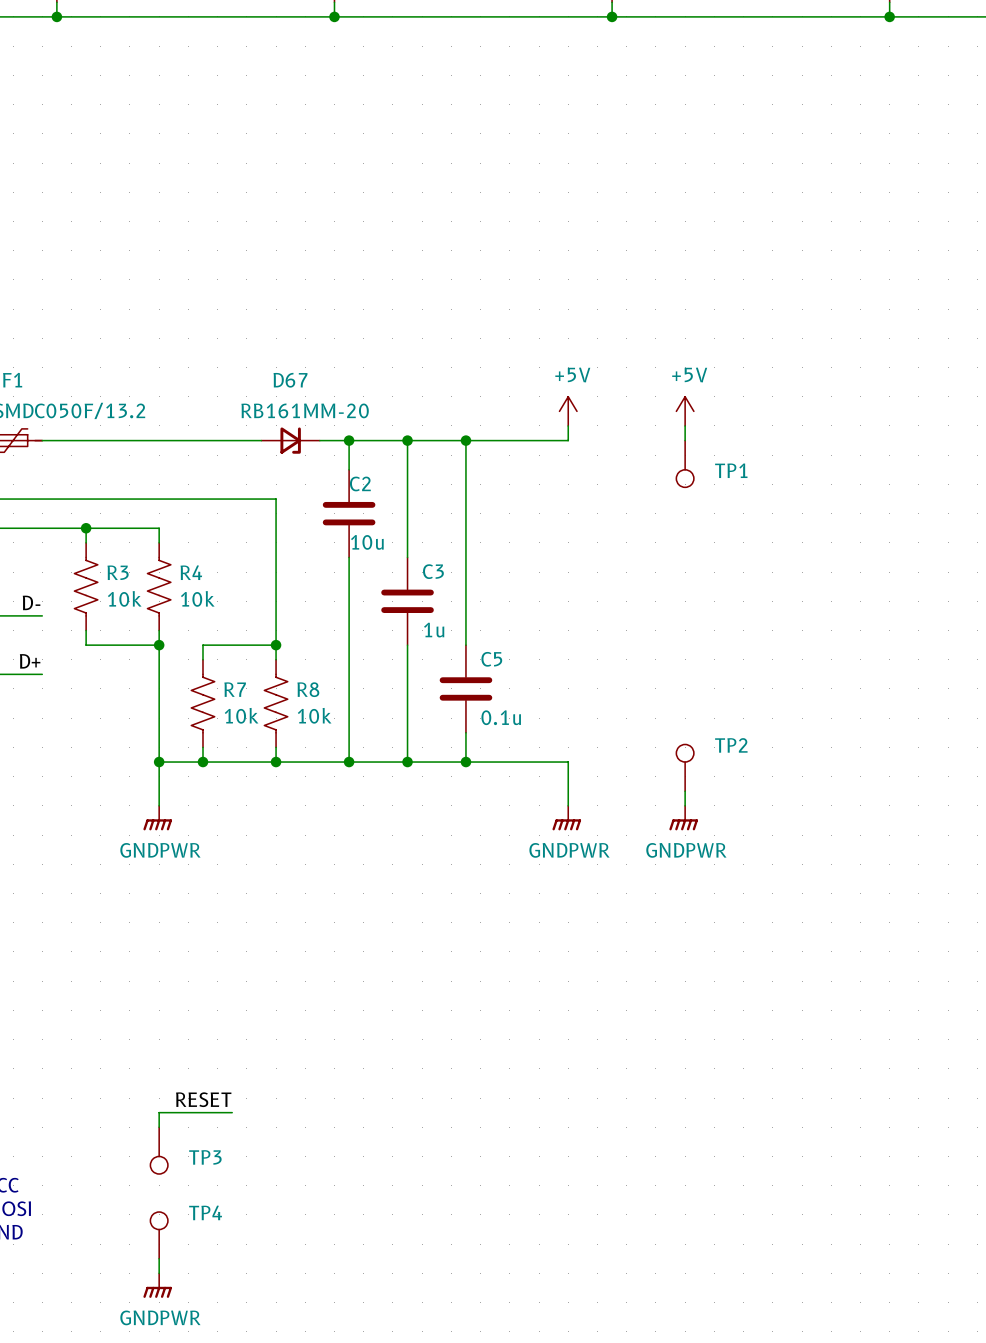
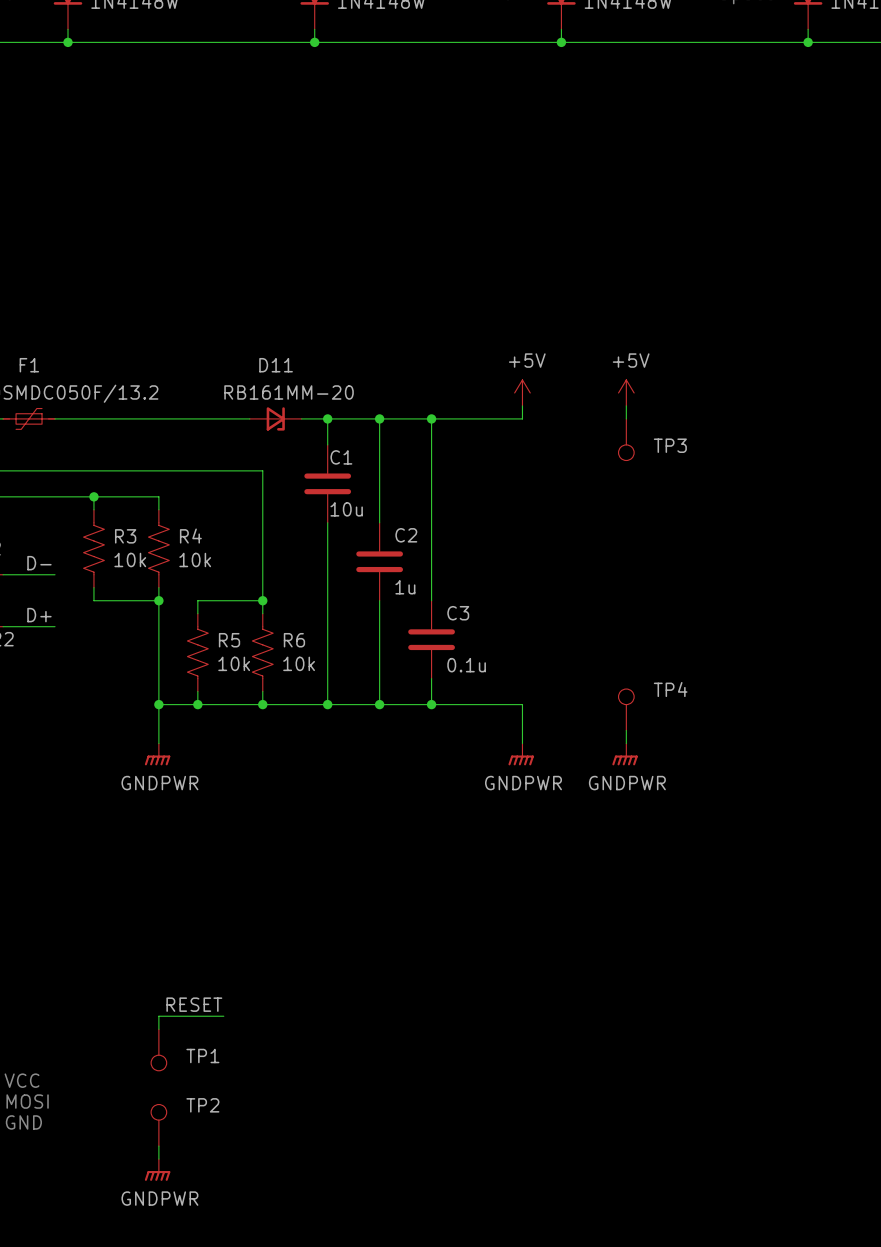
D67 name: D67 (290, 380) -> D11 (276, 365)
TP1 name: TP1 (731, 470) -> TP3 (670, 445)
C2 name: C2 (360, 483) -> C1 (341, 457)
C3 name: C3 (433, 571) -> C2 (406, 535)
C5 name: C5 (491, 659) -> C3 (458, 613)
R7 name: R7 (235, 689) -> R5 (229, 640)
R8 name: R8 (308, 689) -> R6 (294, 640)
TP2 name: TP2 (731, 745) -> TP4 (670, 689)
TP3 name: TP3 (205, 1157) -> TP1 (202, 1056)
TP4 name: TP4 (205, 1212) -> TP2 (202, 1105)

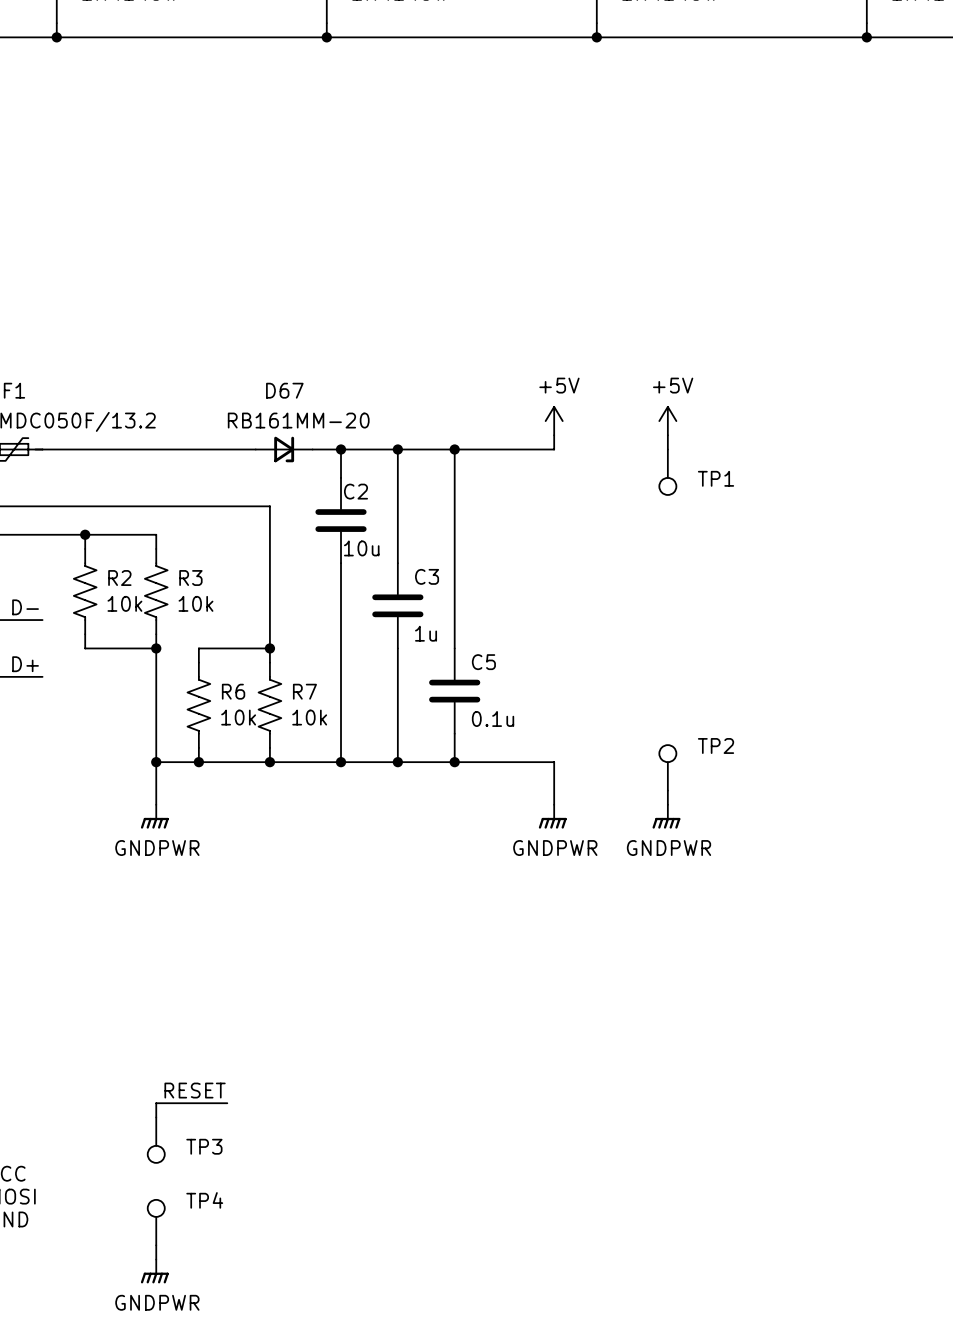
D11 name: D11 (276, 365) -> D67 (284, 390)
TP3 name: TP3 (670, 445) -> TP1 (716, 478)
C1 name: C1 (341, 457) -> C2 (355, 491)
C2 name: C2 (406, 535) -> C3 (427, 576)
R3 name: R3 (125, 536) -> R2 (119, 578)
R4 name: R4 (190, 536) -> R3 (190, 578)
C3 name: C3 (458, 613) -> C5 (483, 662)
R5 name: R5 (229, 640) -> R6 (233, 691)
R6 name: R6 (294, 640) -> R7 (304, 691)
TP4 name: TP4 (670, 689) -> TP2 (716, 745)
TP1 name: TP1 (202, 1056) -> TP3 (204, 1146)
TP2 name: TP2 (202, 1105) -> TP4 (204, 1200)

